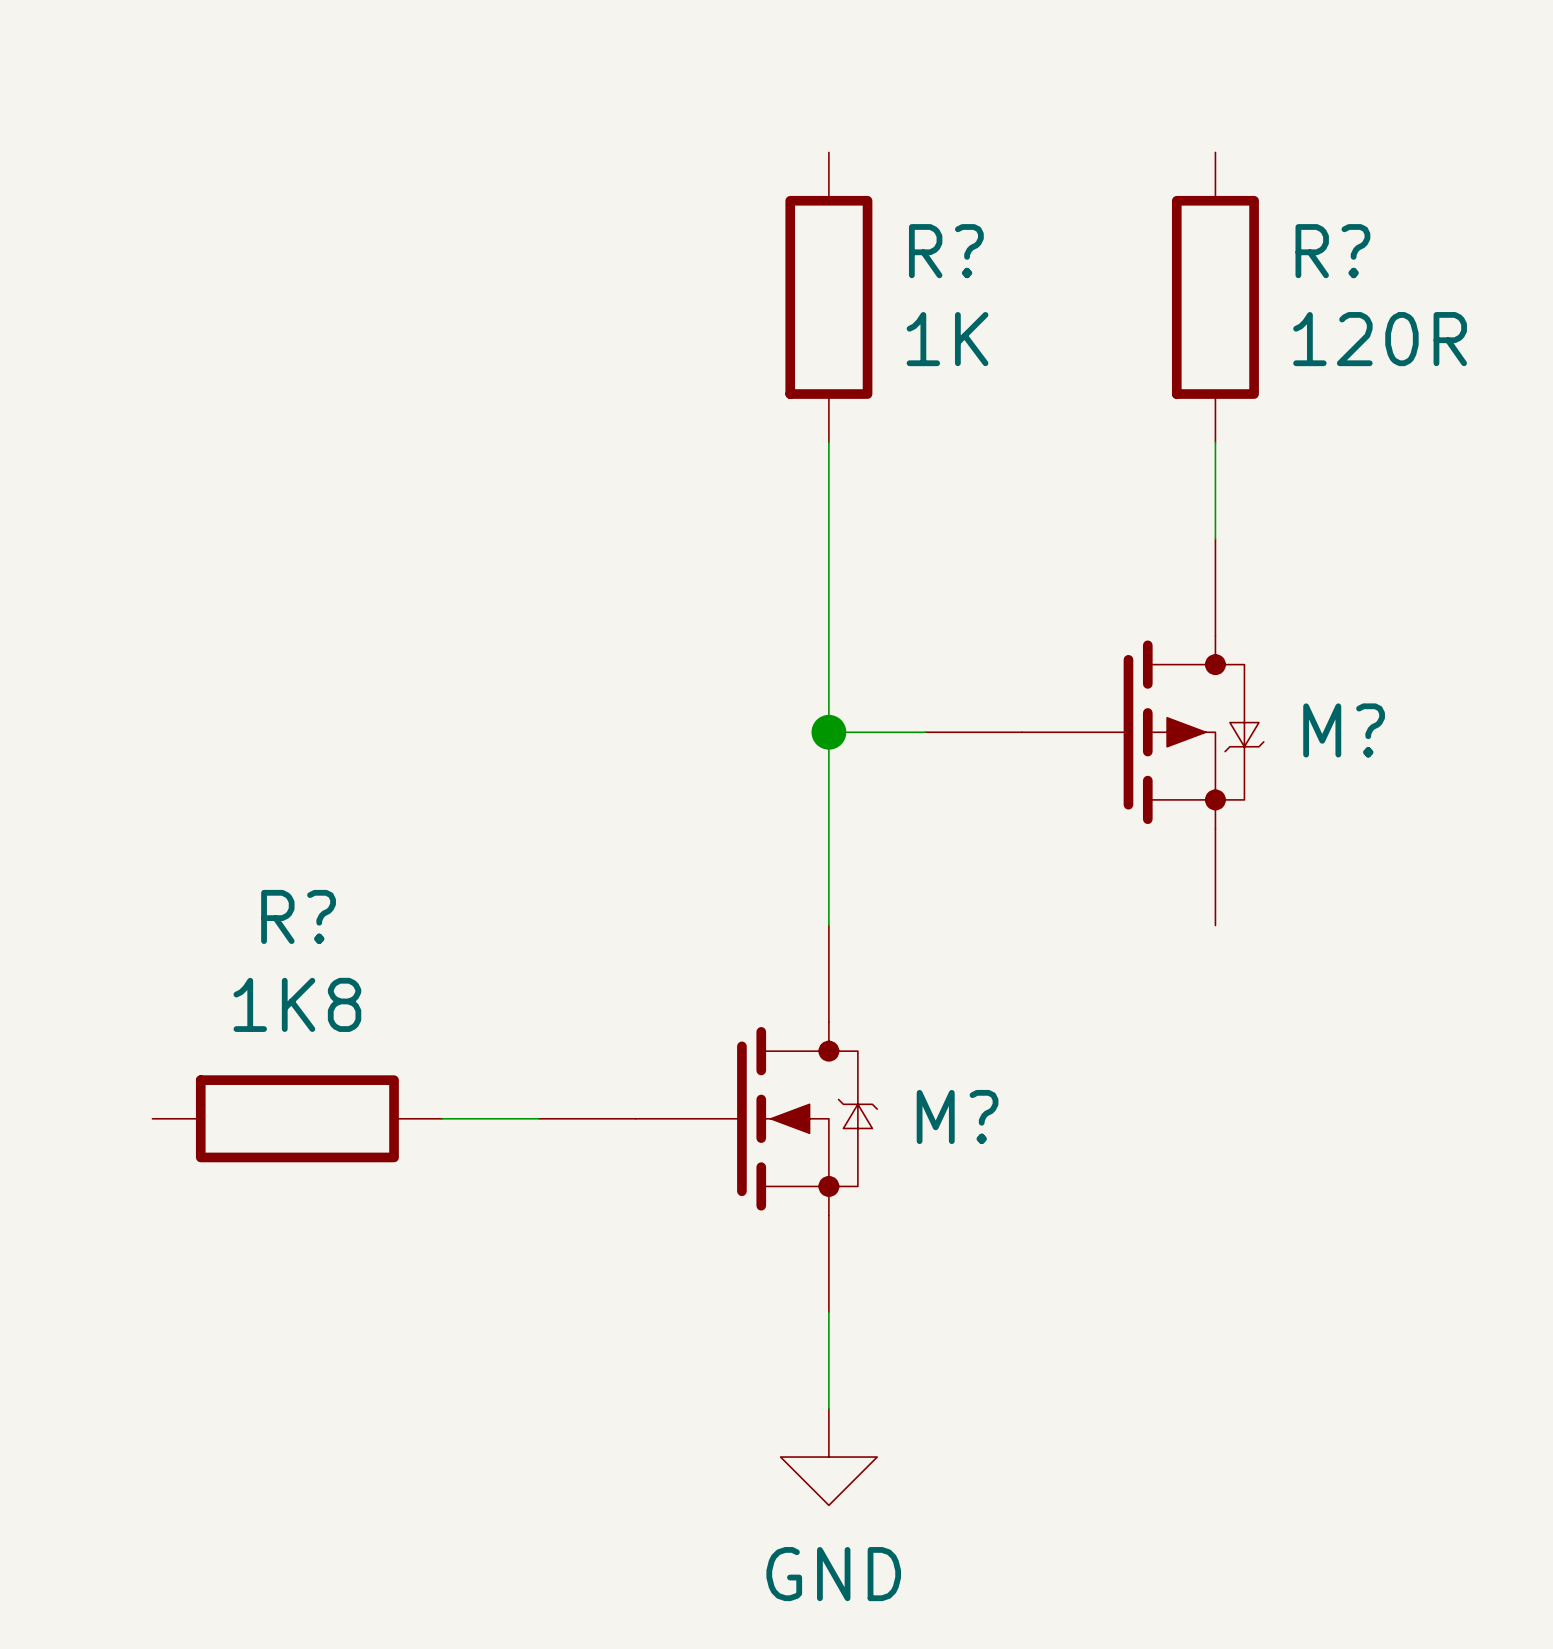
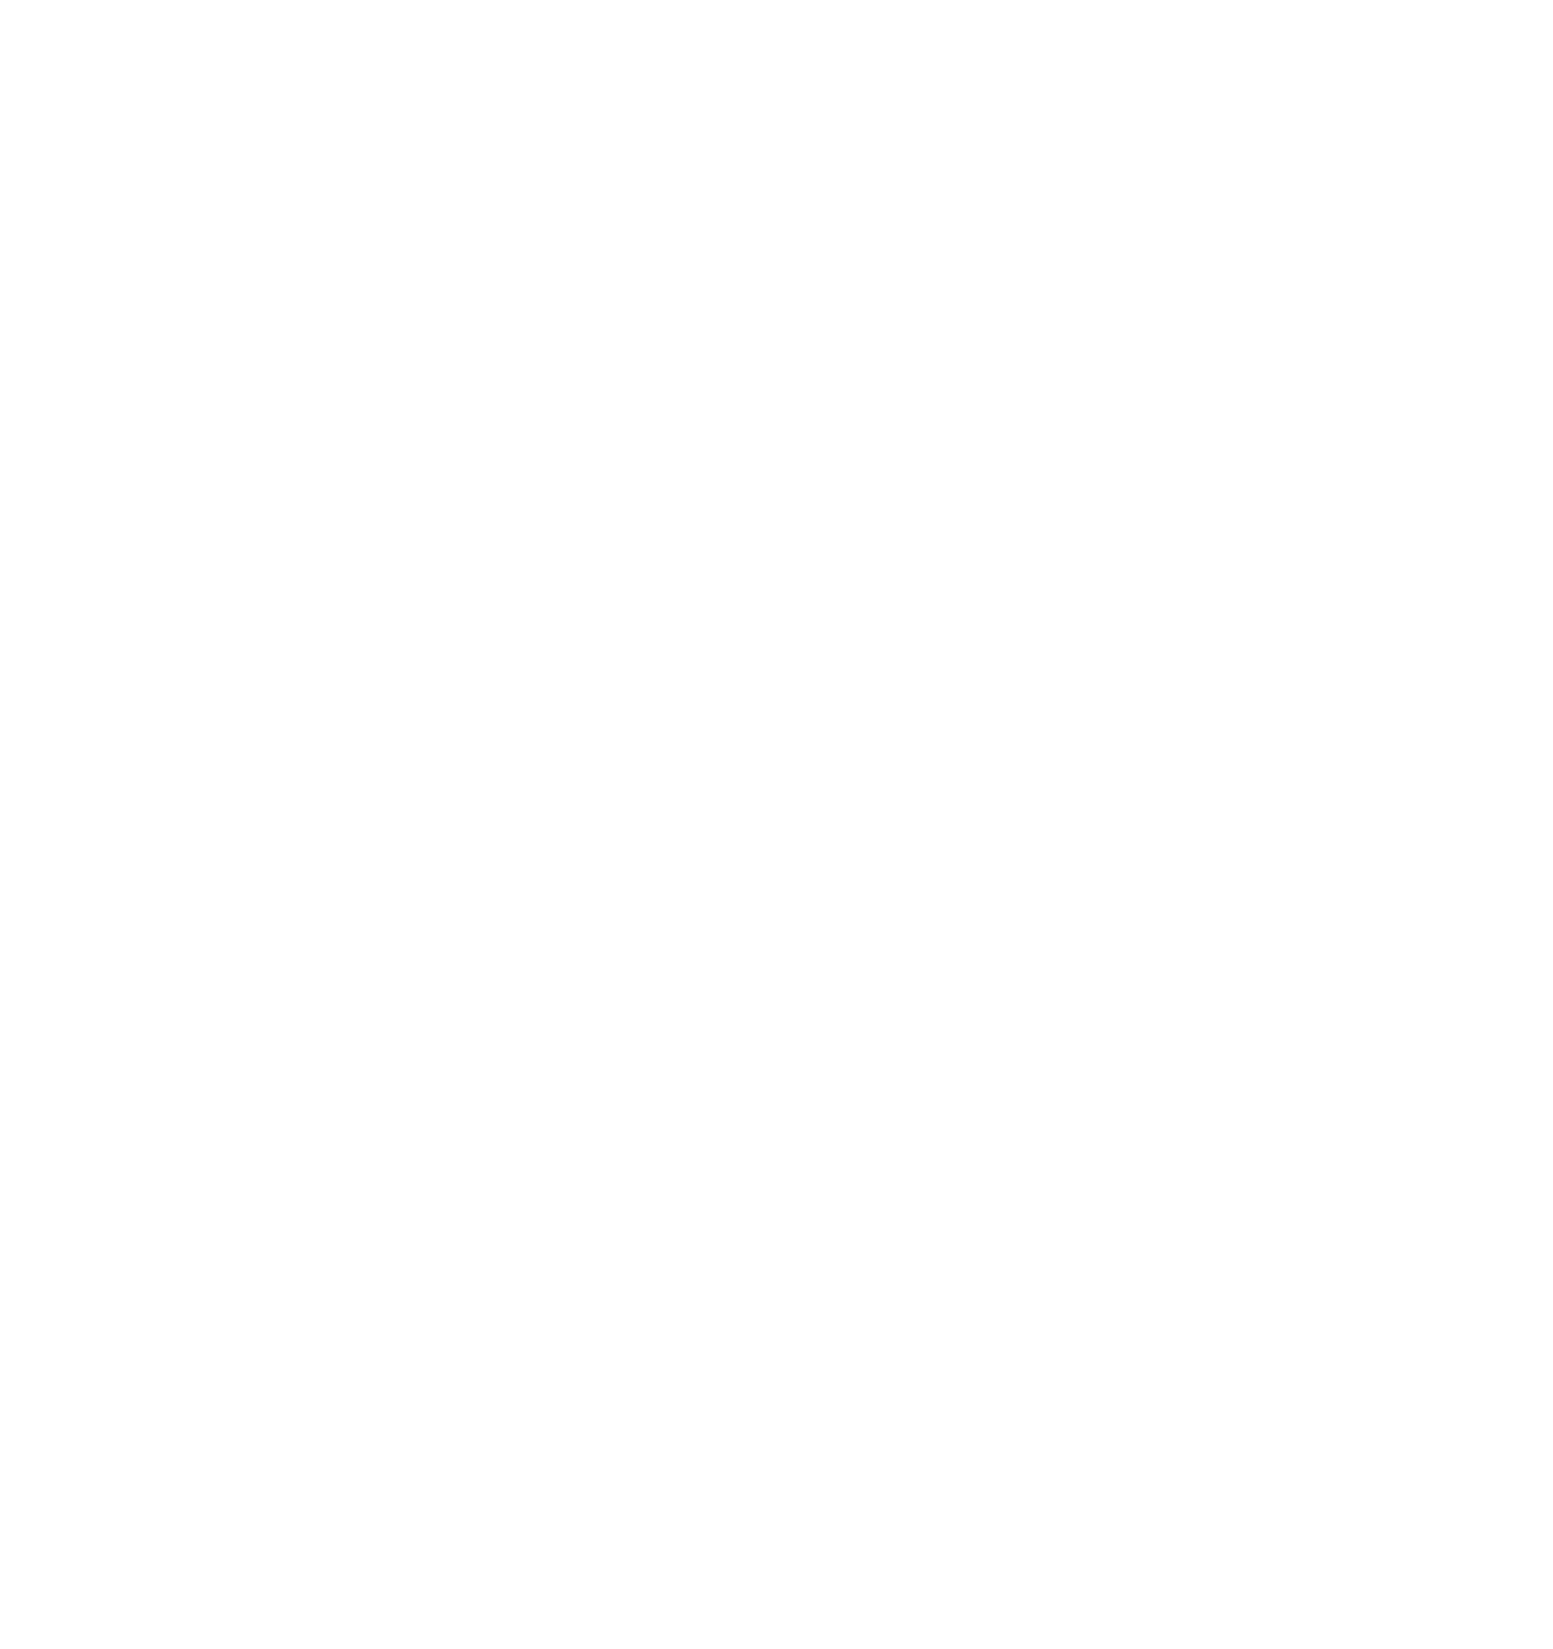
R?: 1K (828, 297) -> none
R?: 120R (1215, 297) -> none
wire: (828, 442) (828, 925) -> none
wire: (1215, 442) (1215, 538) -> none
wire: (828, 732) (925, 732) -> none
junction: (828, 732) -> none
M?: (1094, 732) -> none
R?: 1K8 (297, 1118) -> none
wire: (442, 1118) (538, 1118) -> none
M?: (708, 1118) -> none
wire: (828, 1312) (828, 1408) -> none
power symbol: GND (828, 1457) -> none

